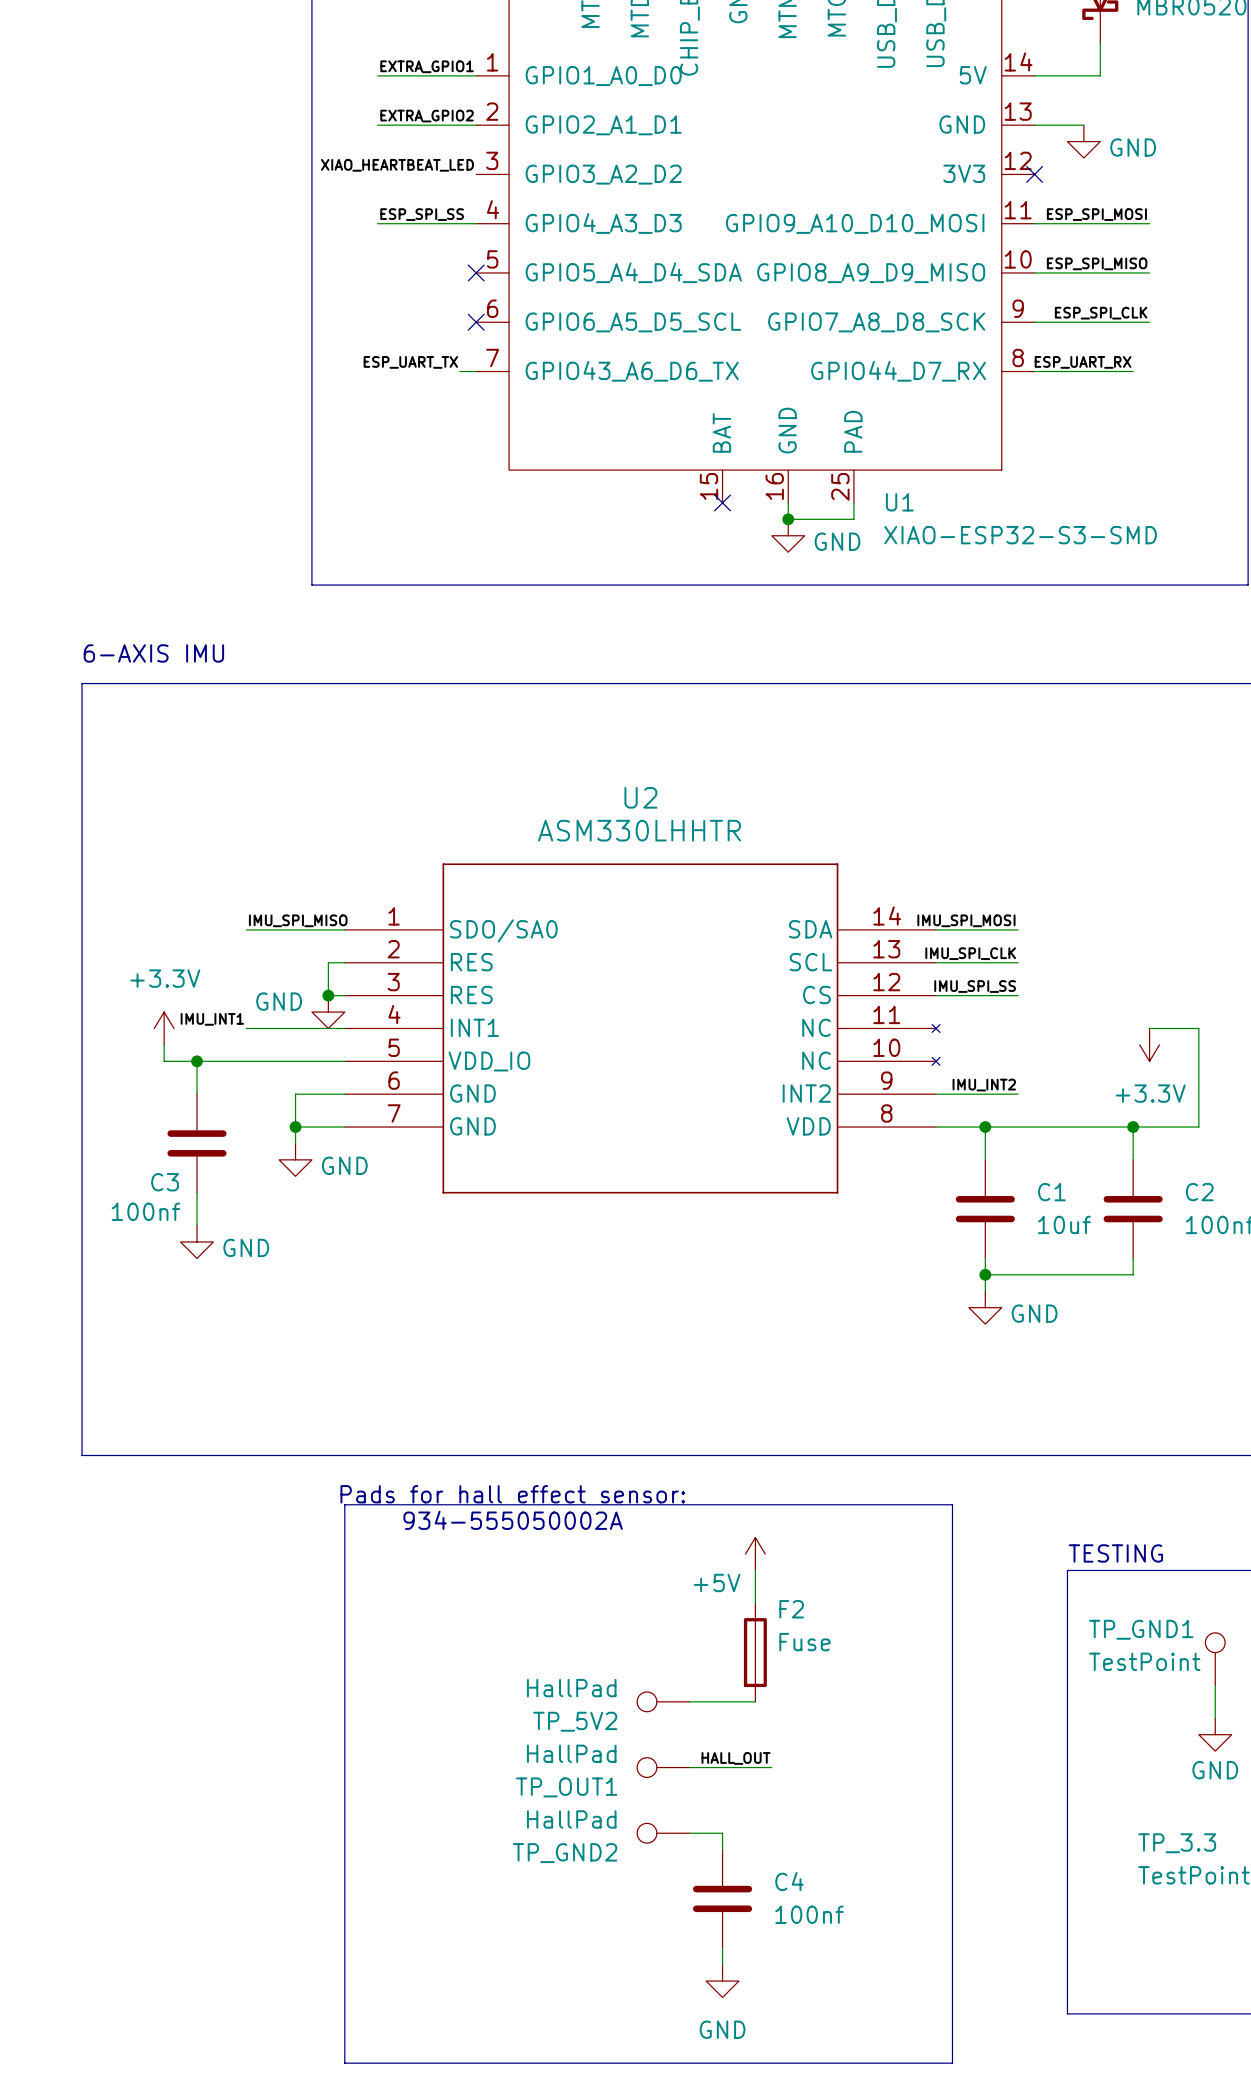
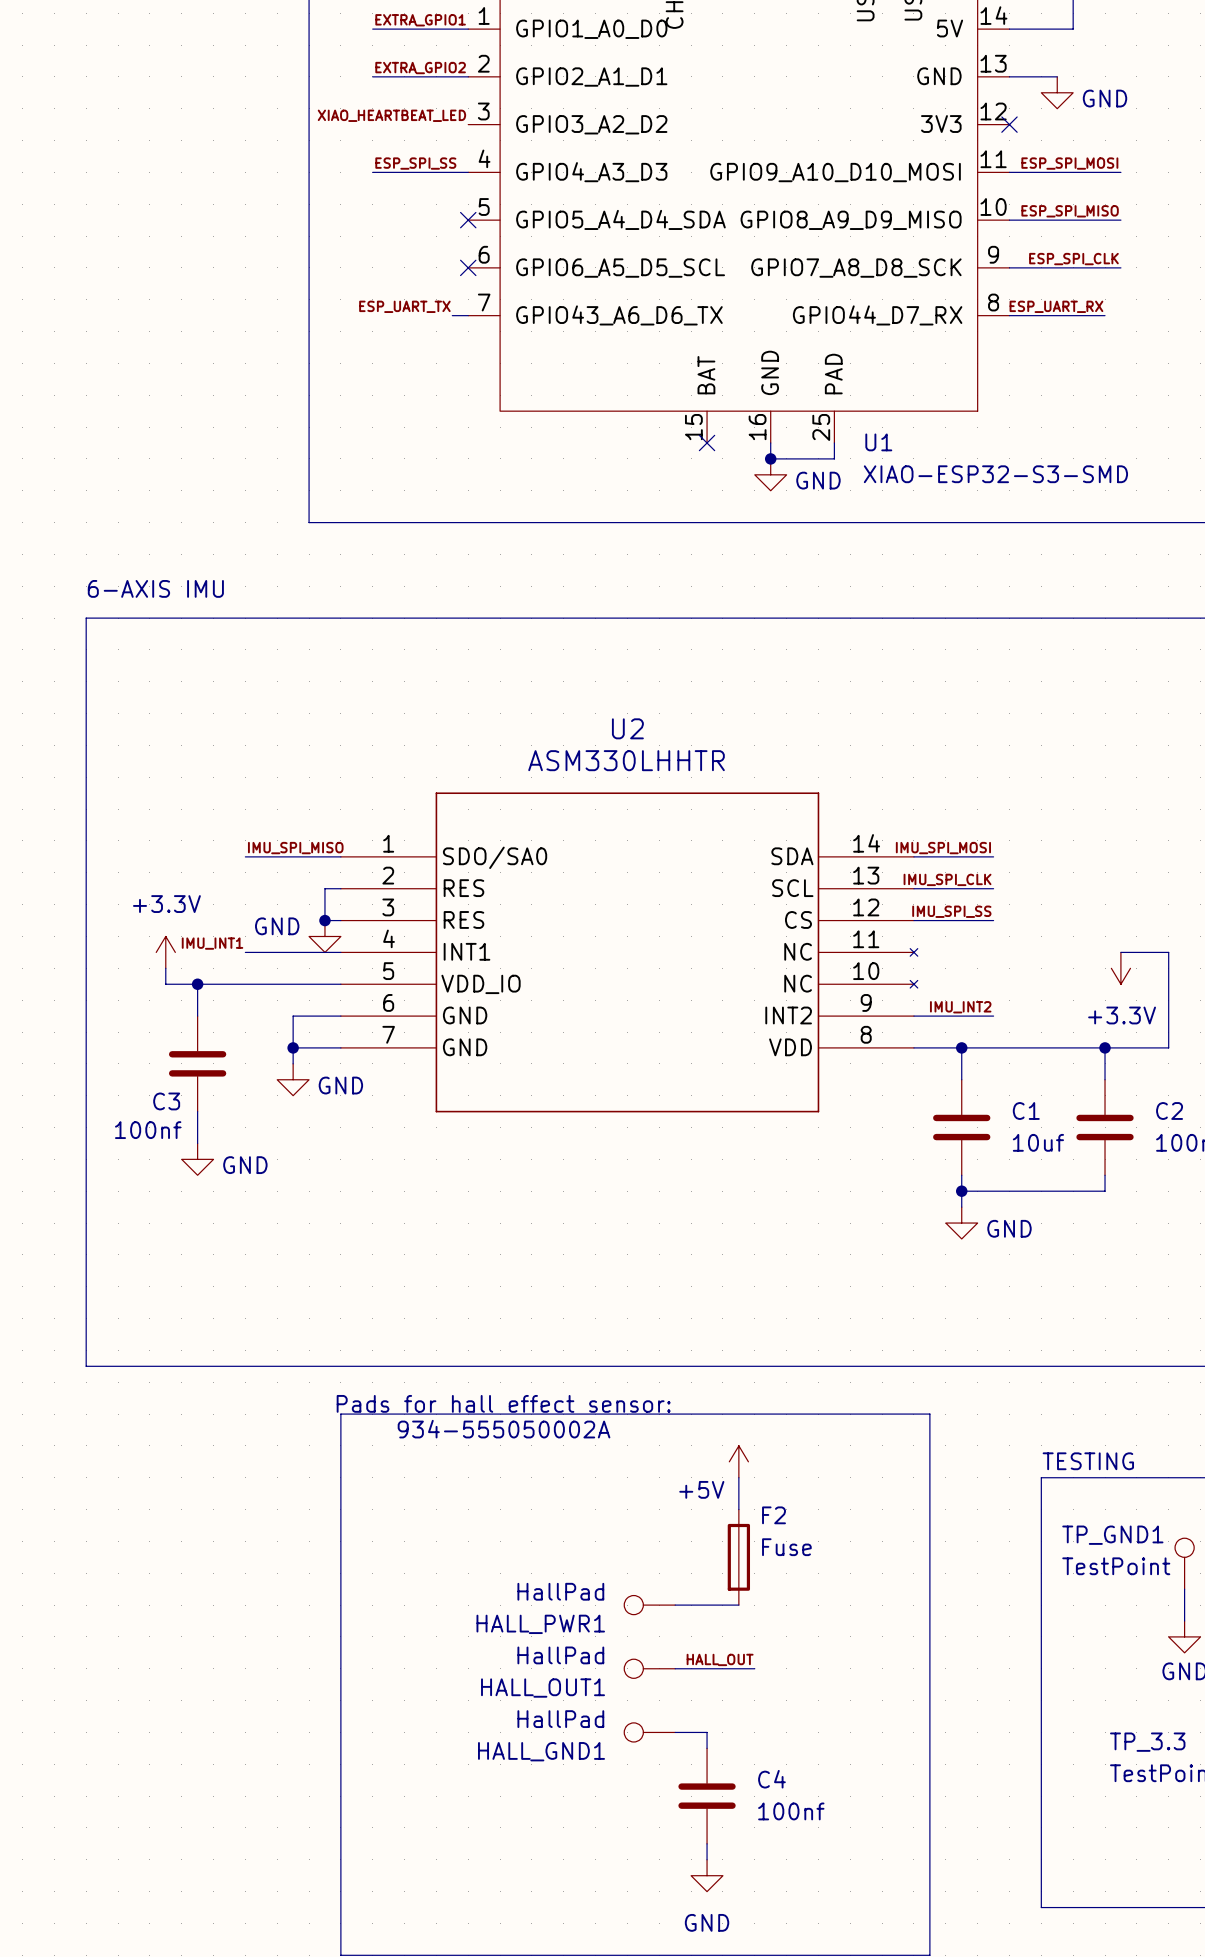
TP_5V2 name: TP_5V2 (575, 1721) -> HALL_PWR1 (540, 1624)
TP_OUT1 name: TP_OUT1 (566, 1787) -> HALL_OUT1 (543, 1688)
TP_GND2 name: TP_GND2 (565, 1853) -> HALL_GND1 (541, 1751)

